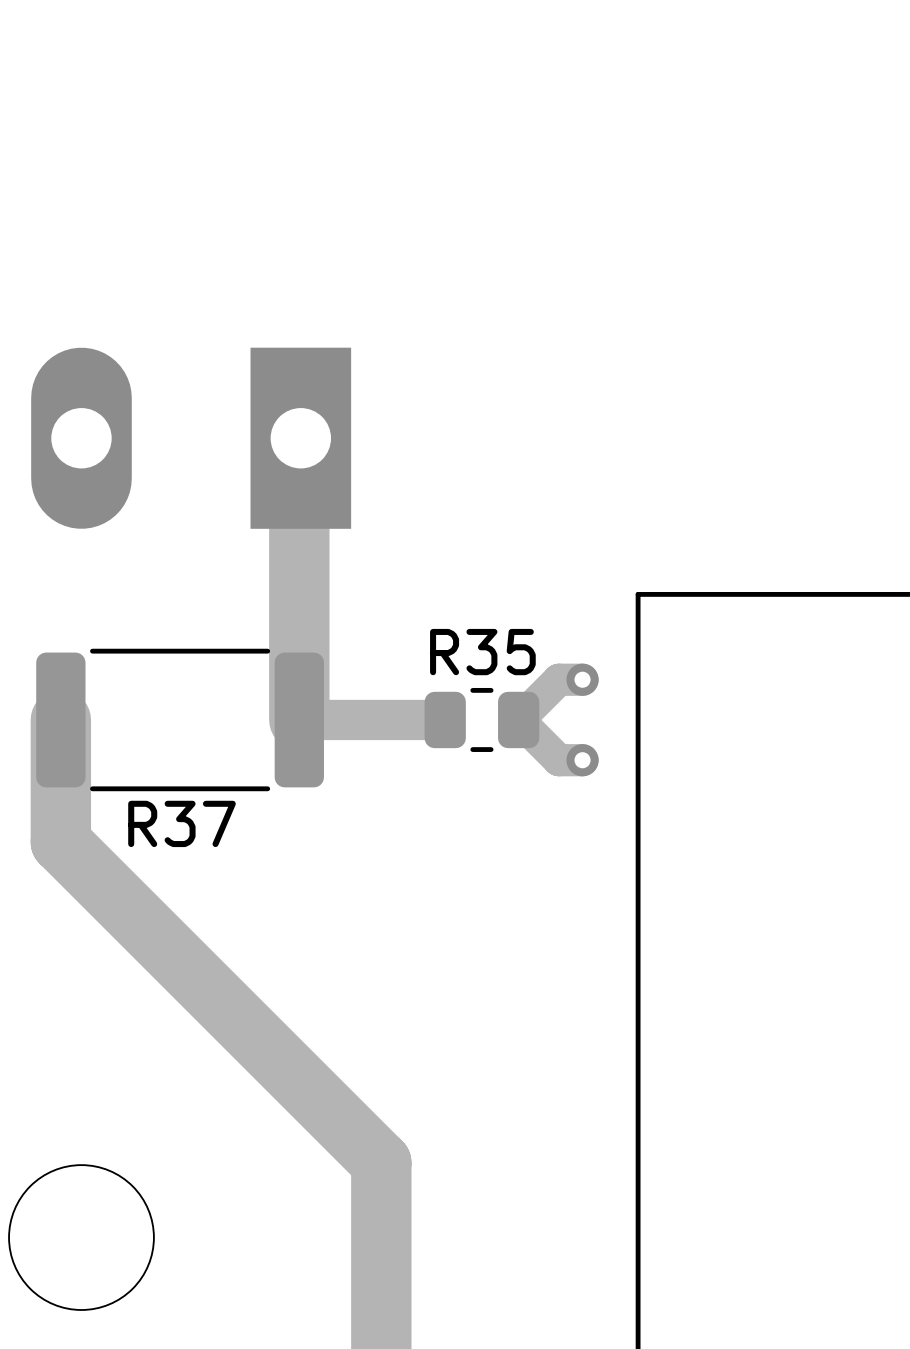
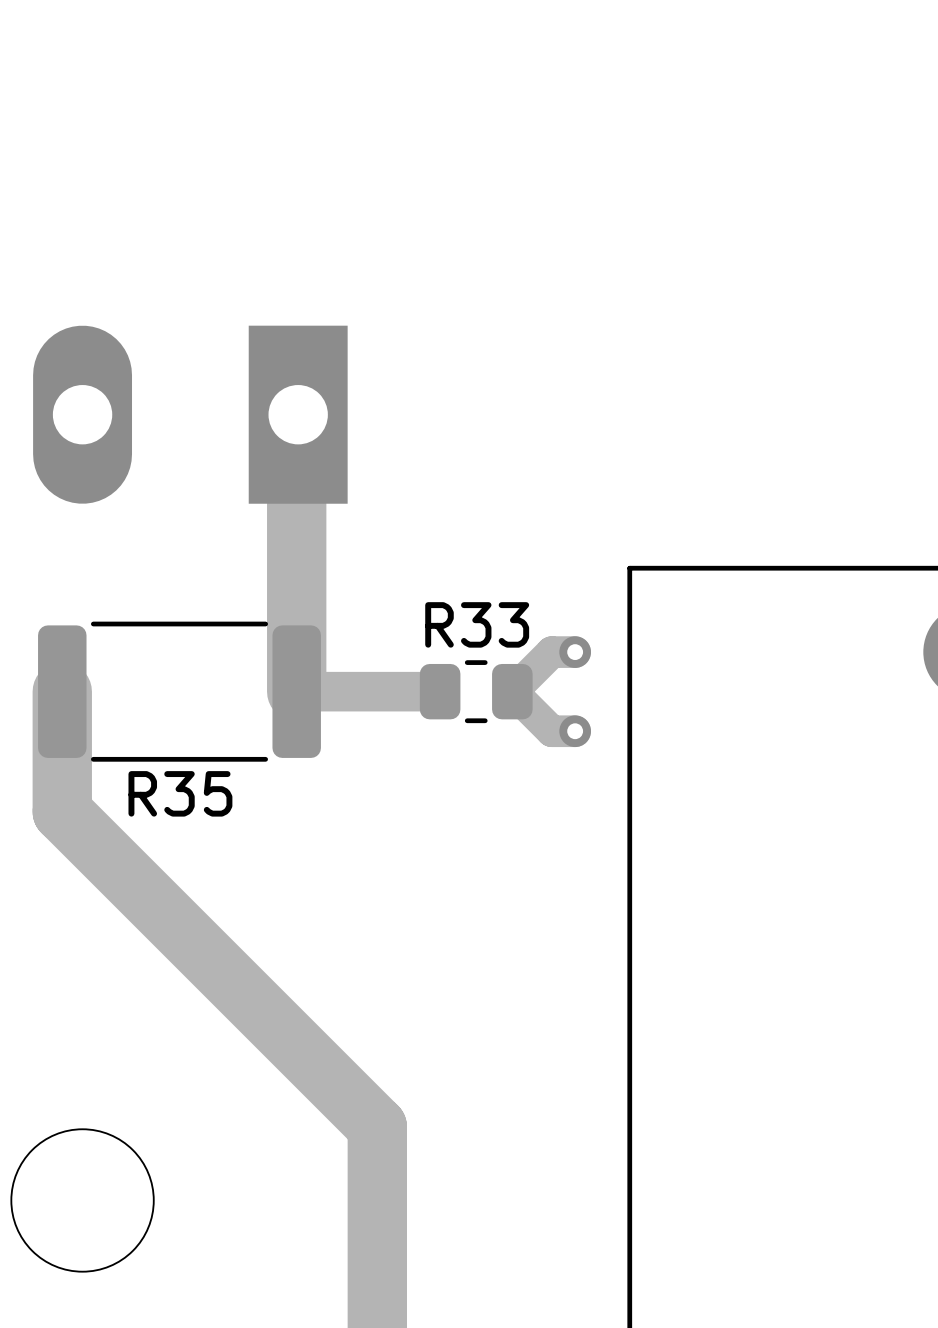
R35 name: R35 (482, 652) -> R33 (477, 624)
R37 name: R37 (182, 823) -> R35 (180, 793)

